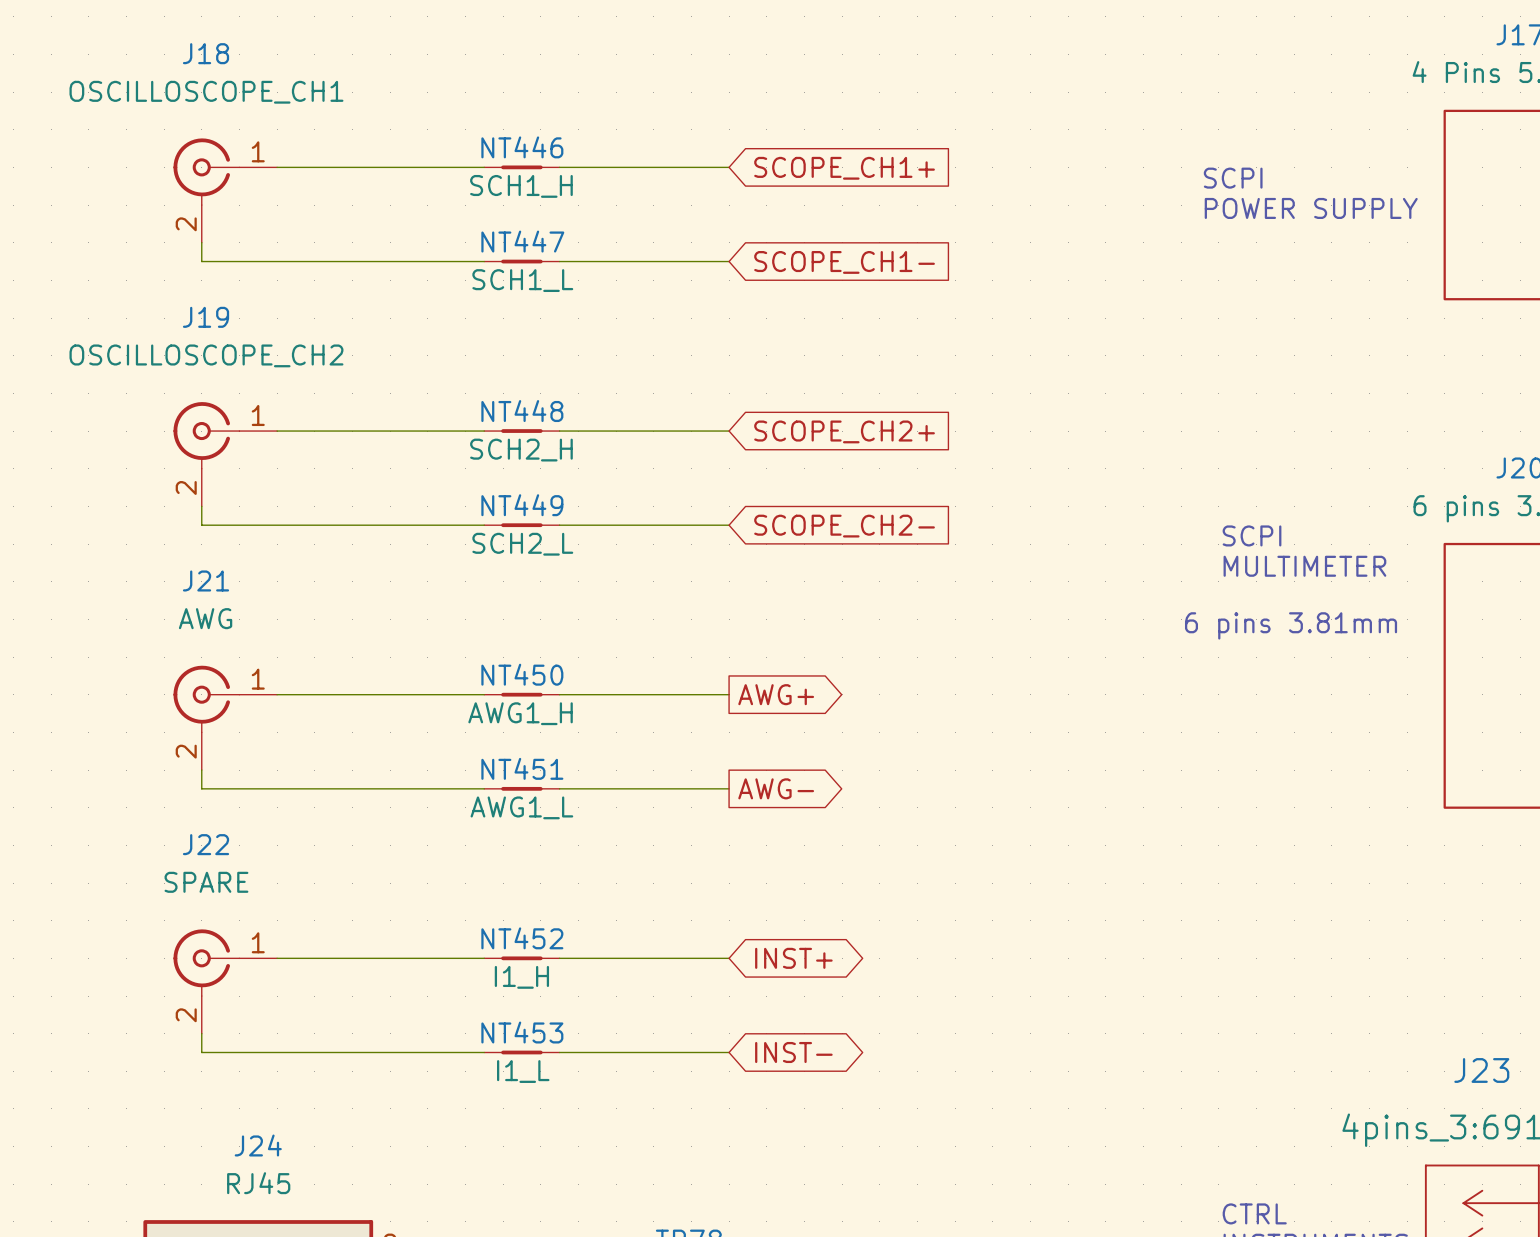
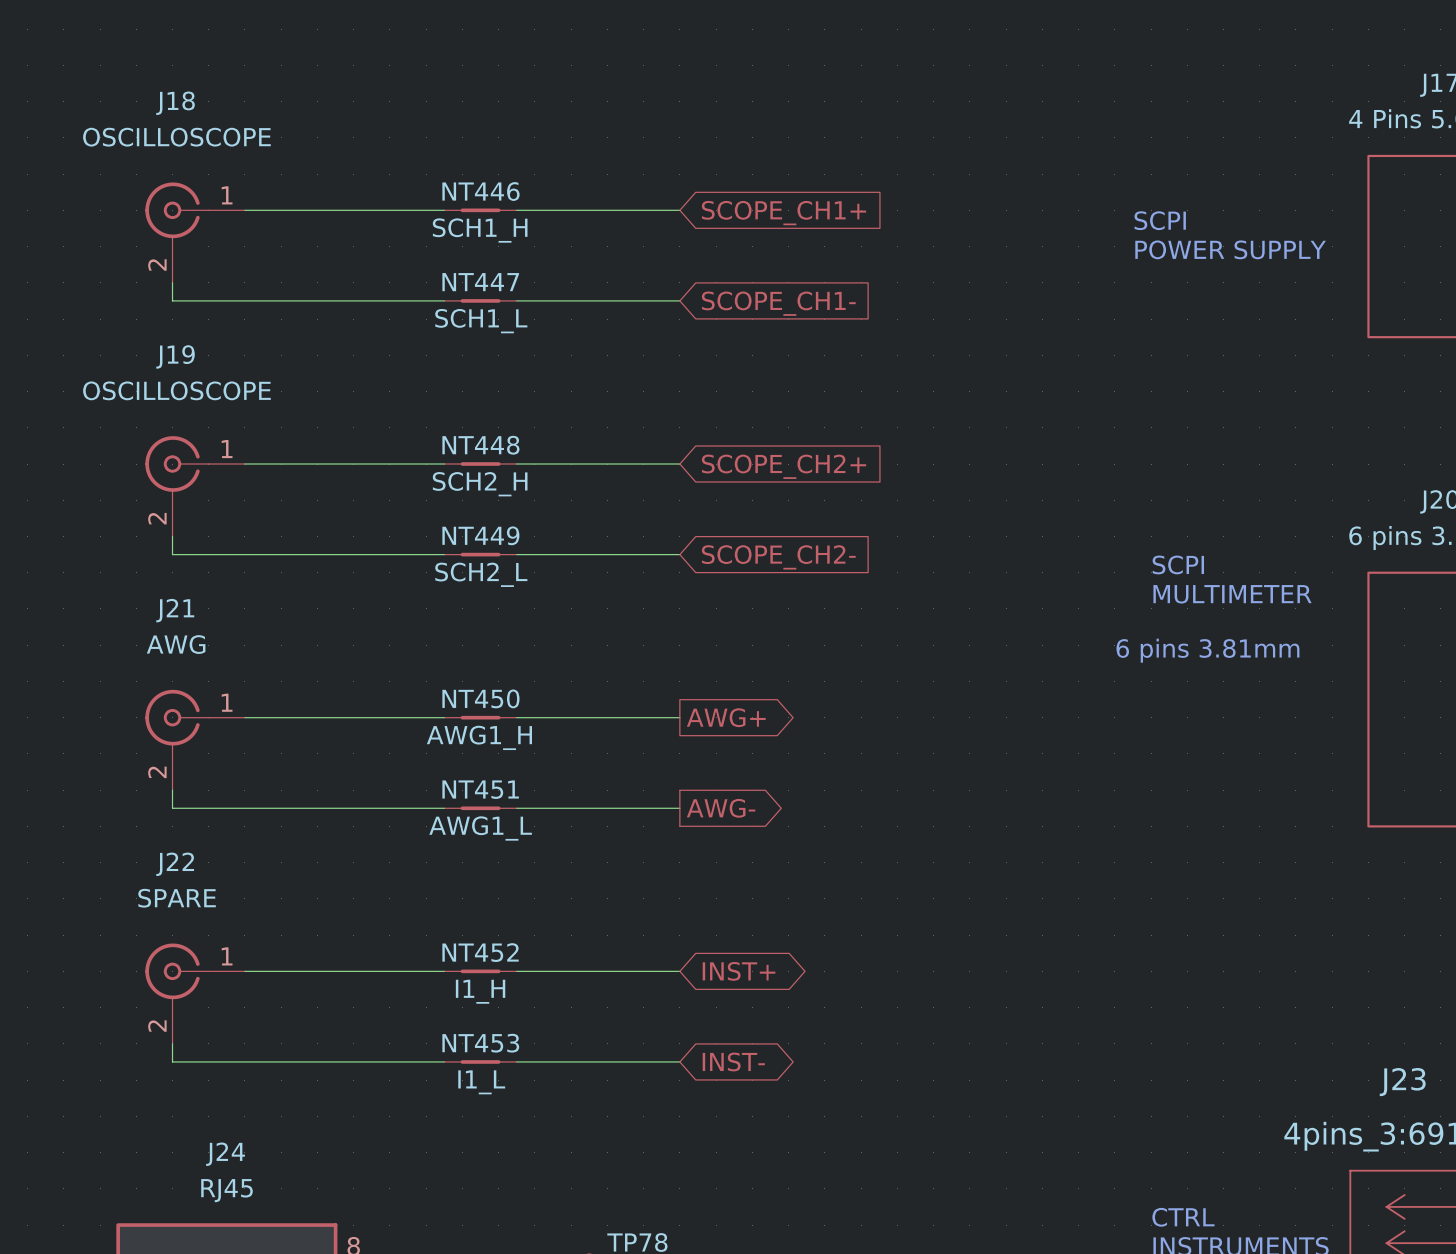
J18 value: OSCILLOSCOPE_CH1 (206, 92) -> OSCILLOSCOPE (176, 137)
J19 value: OSCILLOSCOPE_CH2 (206, 355) -> OSCILLOSCOPE (176, 390)

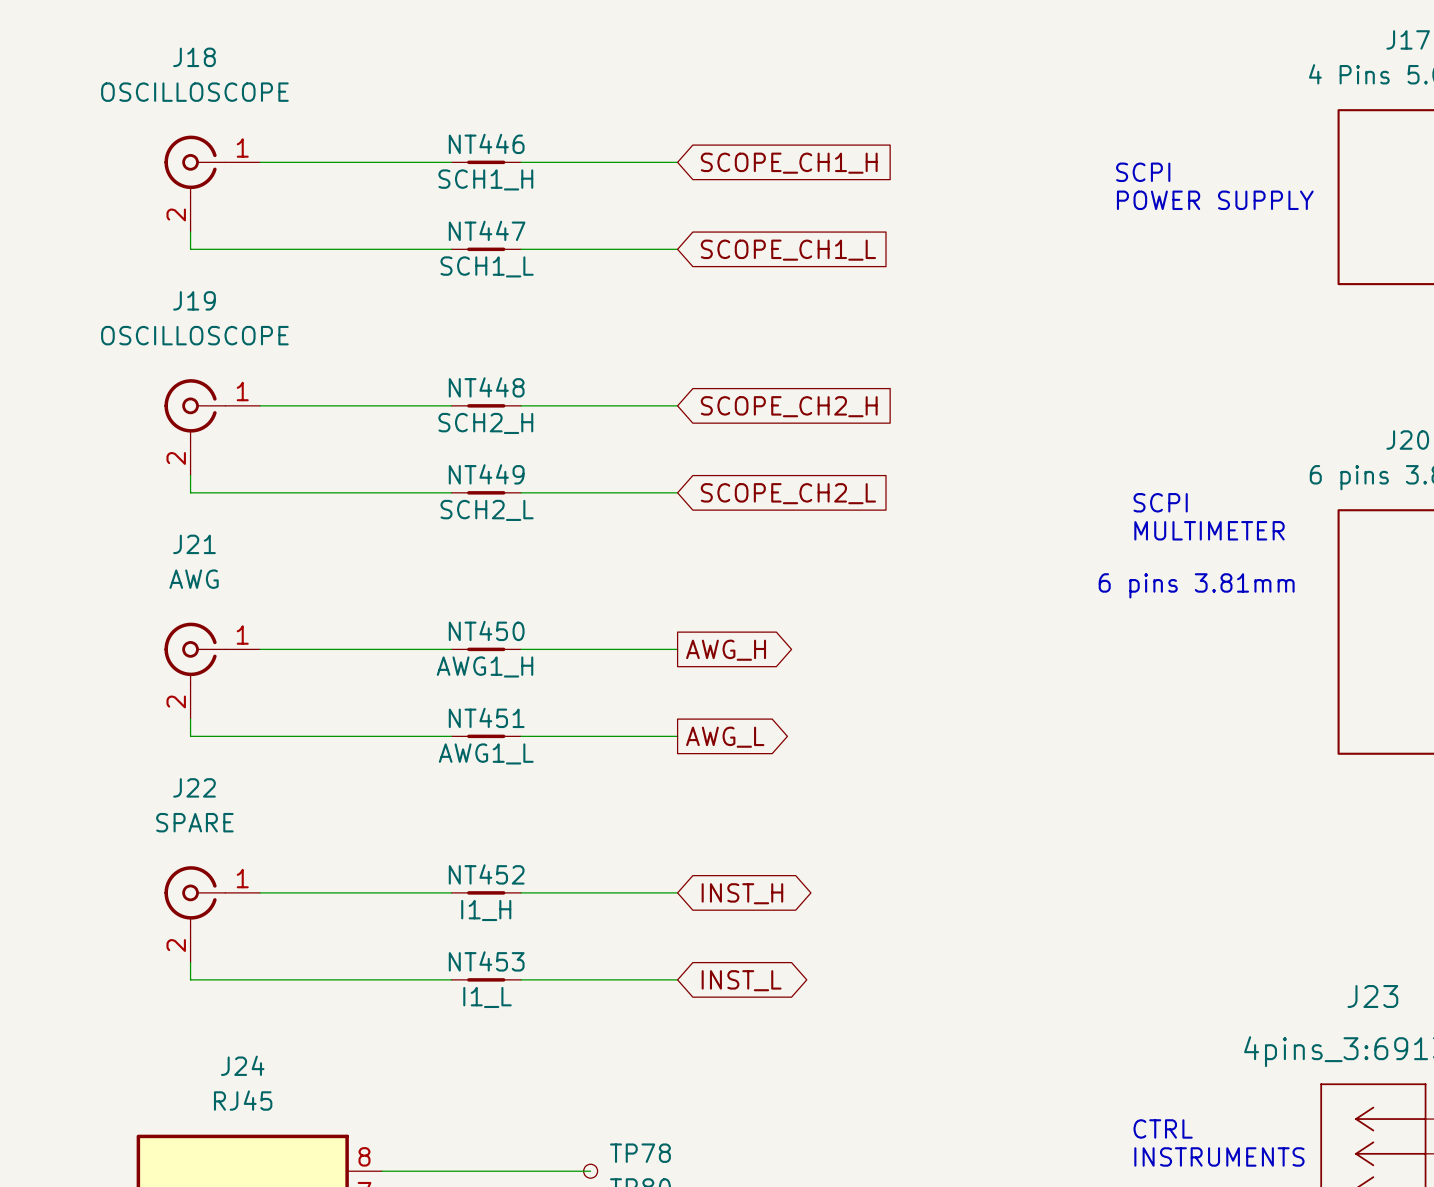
global label: SCOPE_CH1+ (784, 213) -> SCOPE_CH1_H (789, 163)
global label: SCOPE_CH1- (778, 303) -> SCOPE_CH1_L (788, 250)
global label: SCOPE_CH2+ (784, 466) -> SCOPE_CH2_H (789, 406)
global label: SCOPE_CH2- (778, 557) -> SCOPE_CH2_L (788, 493)
global label: AWG+ (726, 717) -> AWG_H (726, 650)
global label: AWG- (721, 808) -> AWG_L (725, 737)
global label: INST+ (739, 971) -> INST_H (742, 893)
global label: INST- (733, 1061) -> INST_L (741, 980)

